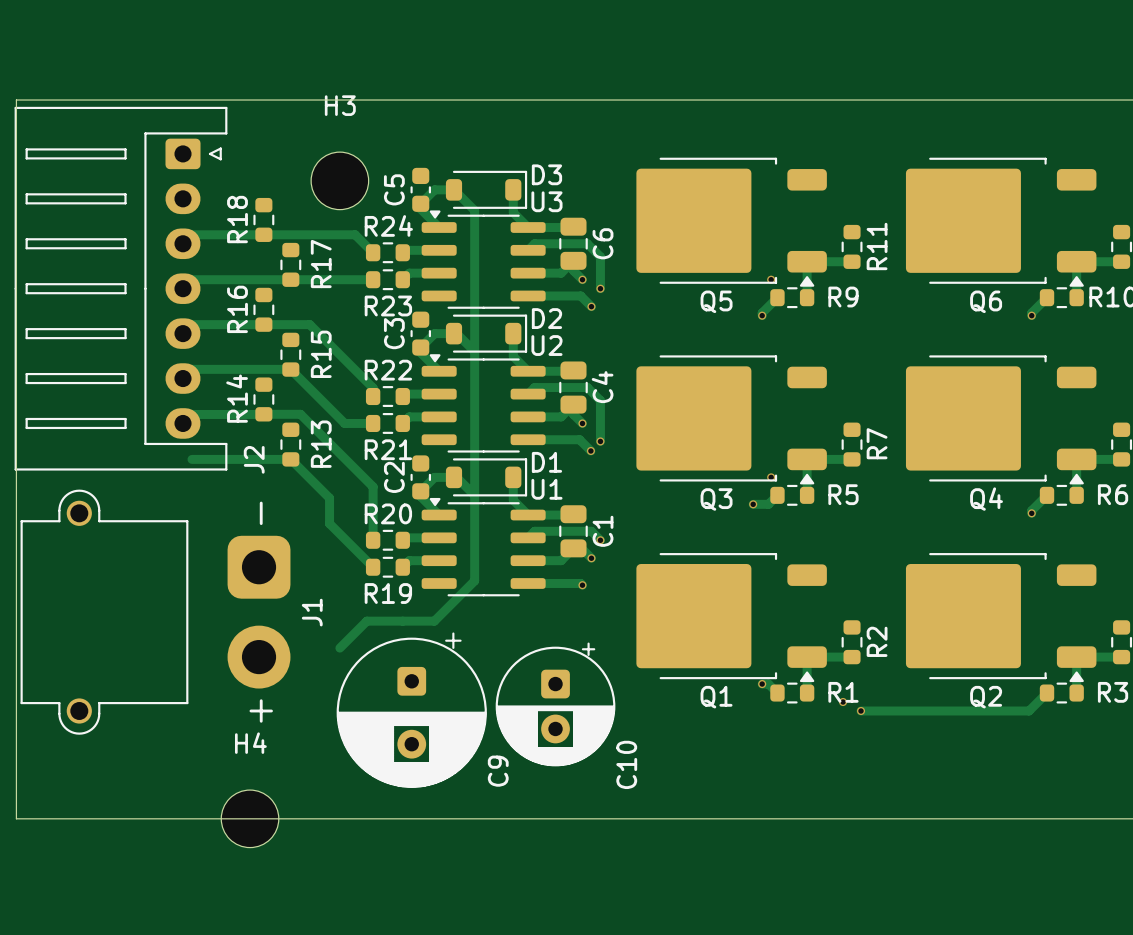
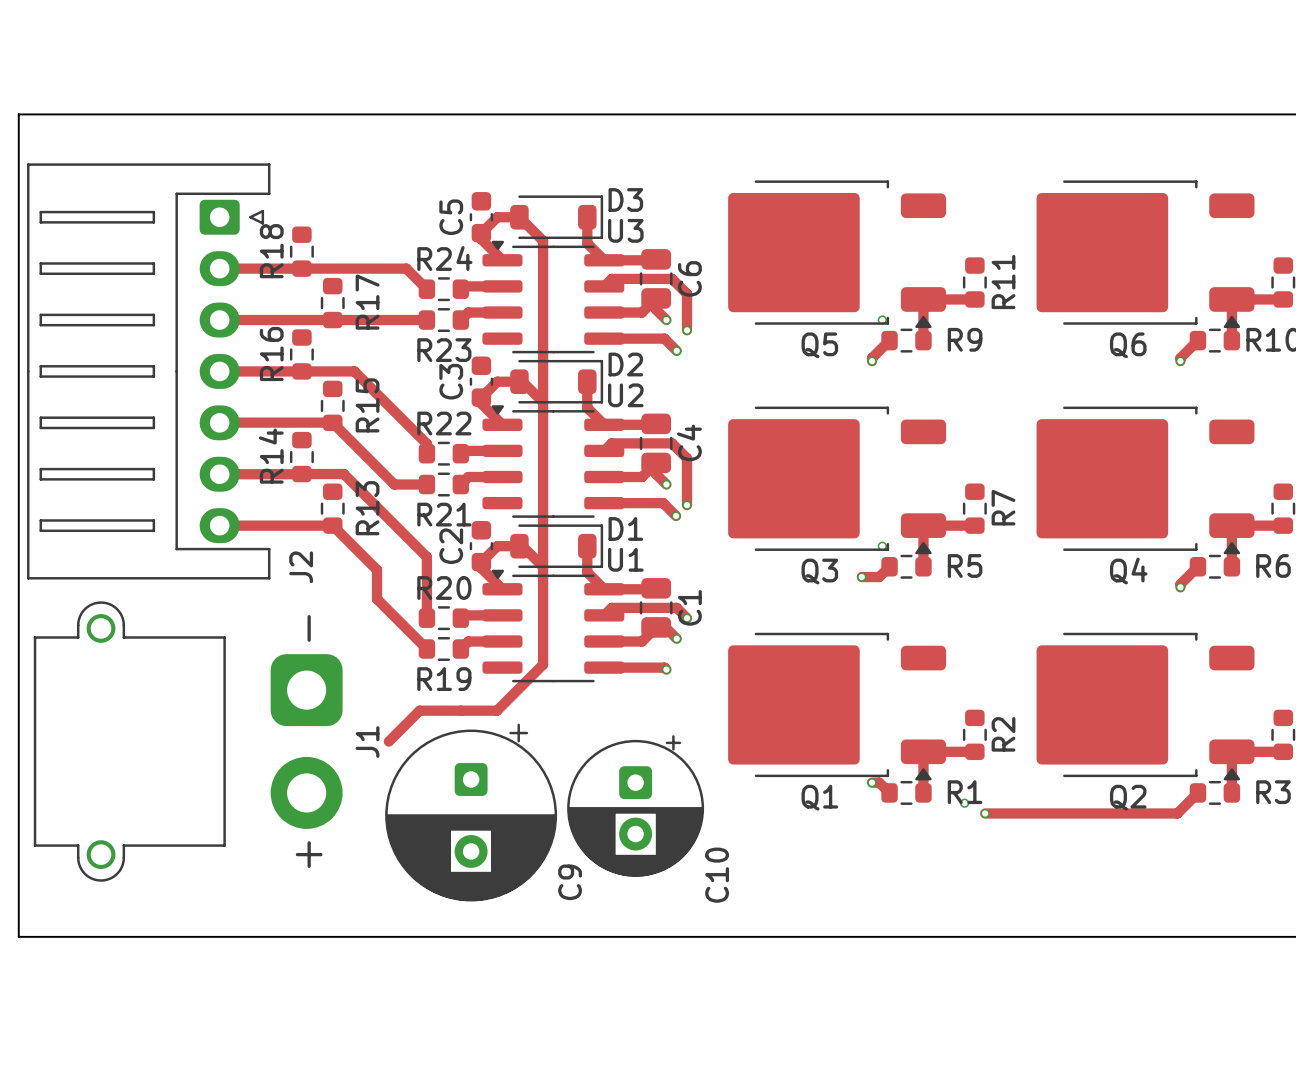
H3: (339, 180) -> none
J2 position: (121, 288) -> (148, 371)
J1 position: (155, 612) -> (188, 741)
H4: (250, 818) -> none

